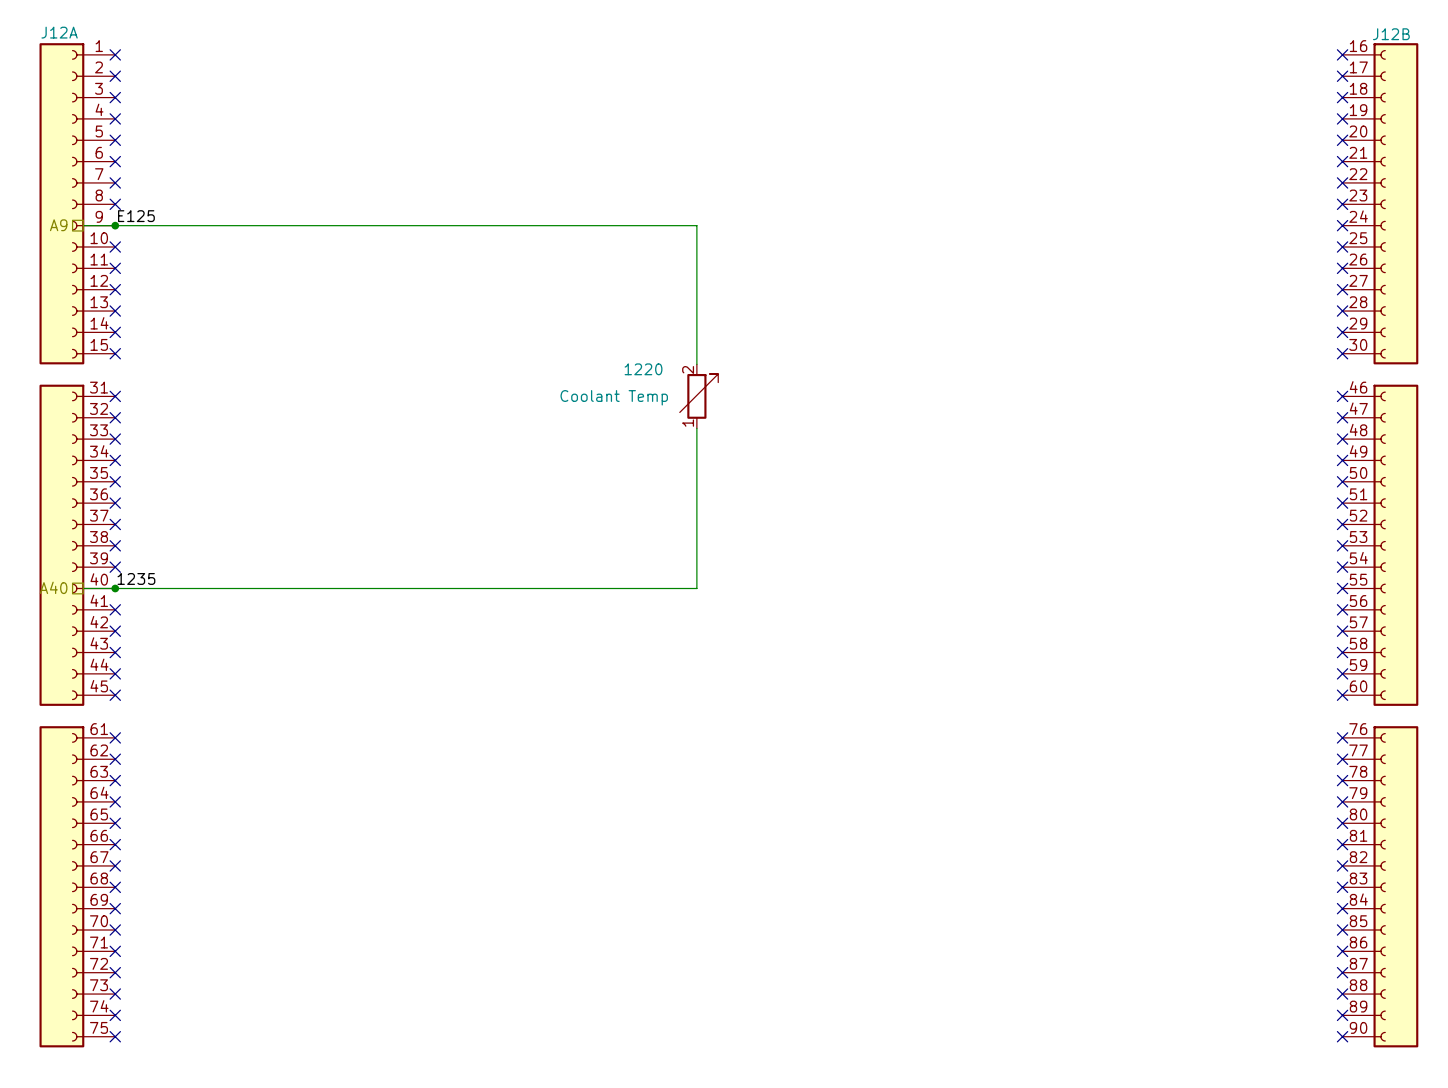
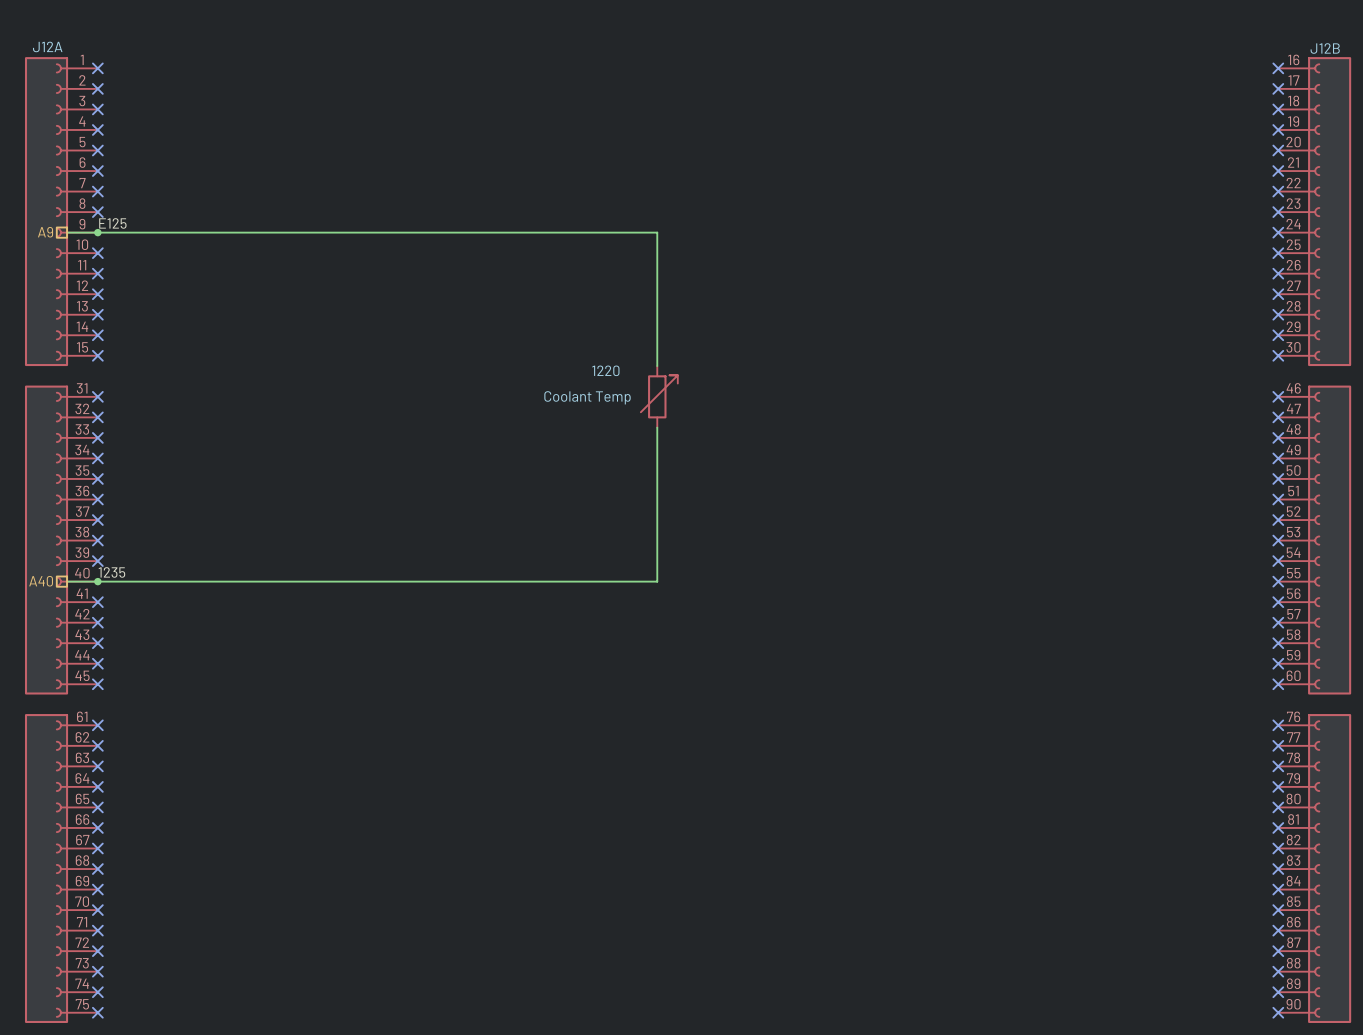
part pin number: 2 (688, 369) -> none
part pin number: 1 (688, 423) -> none

